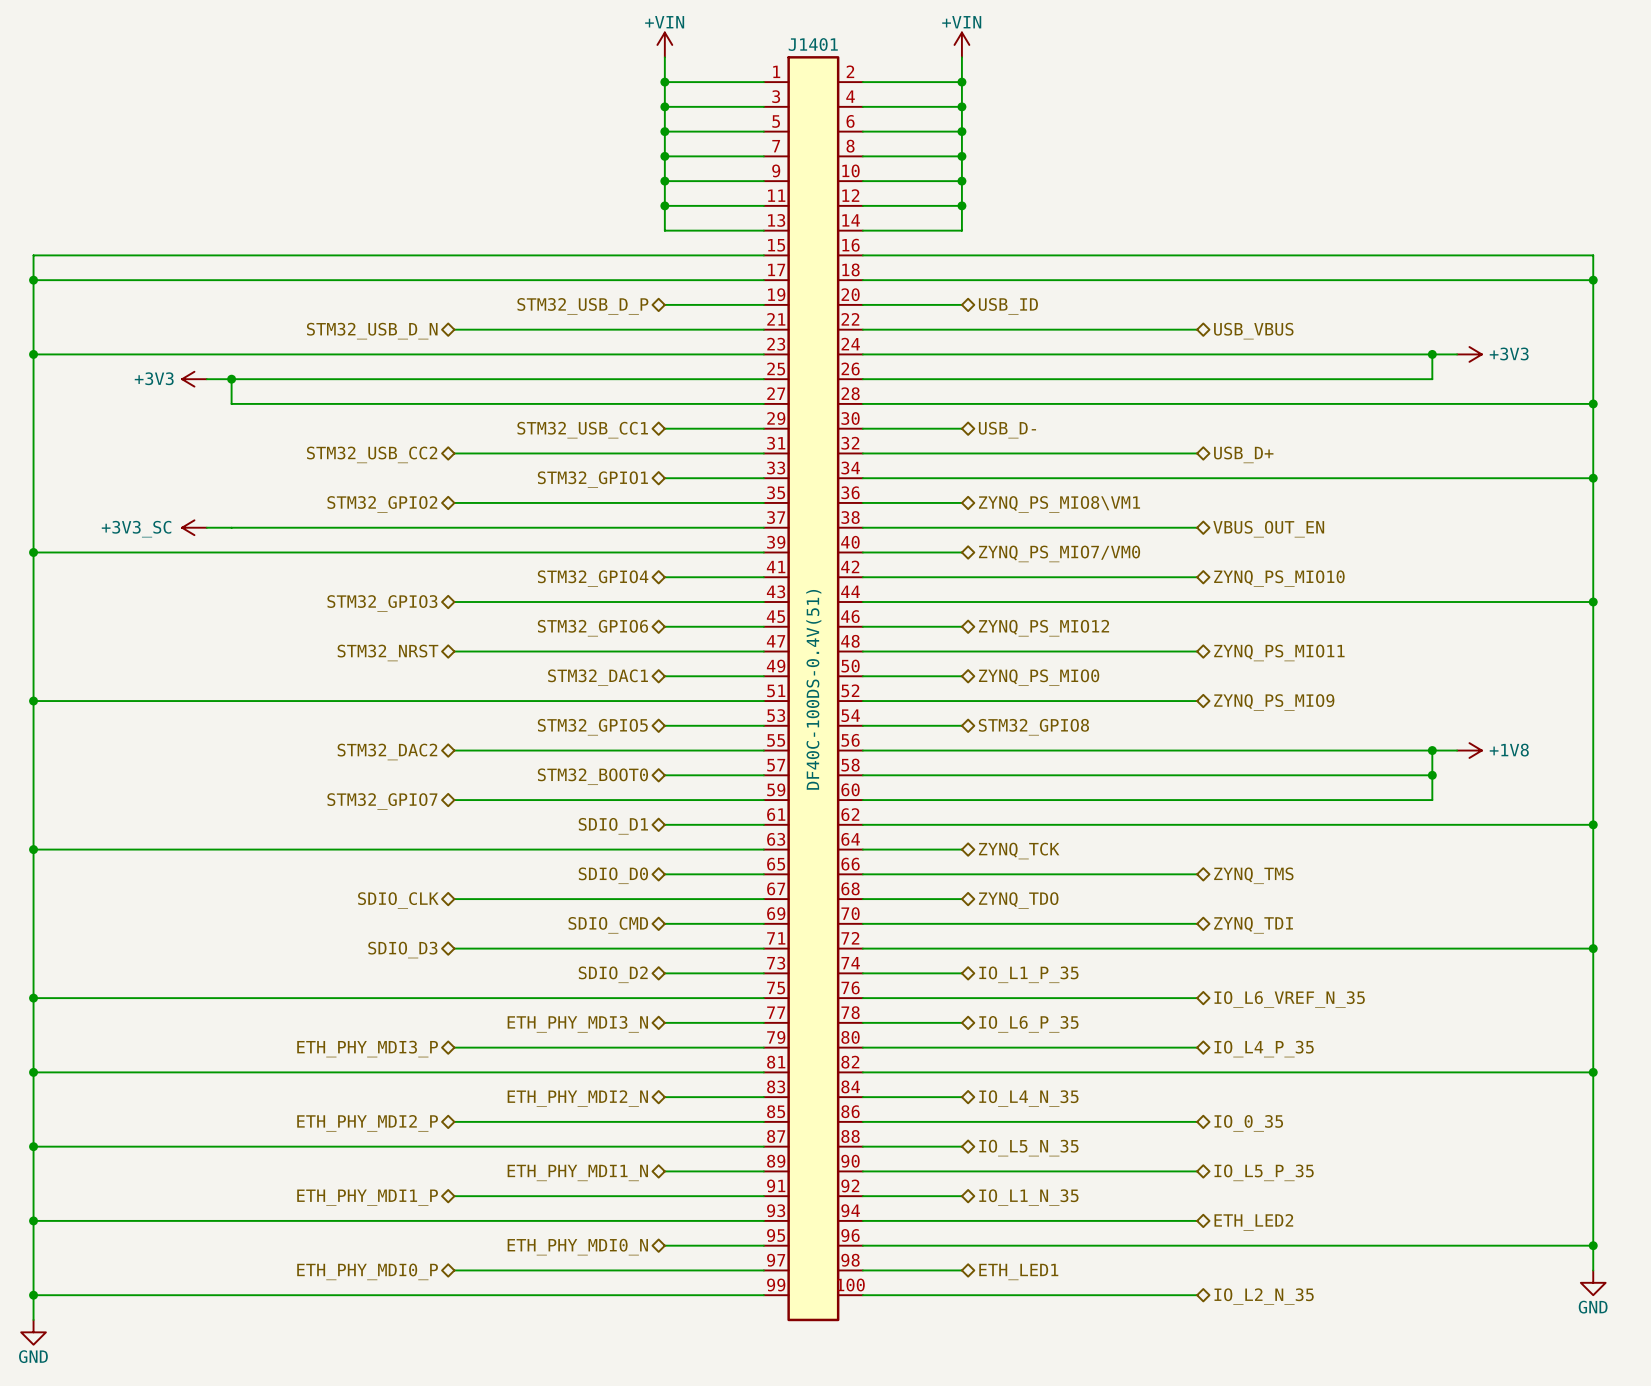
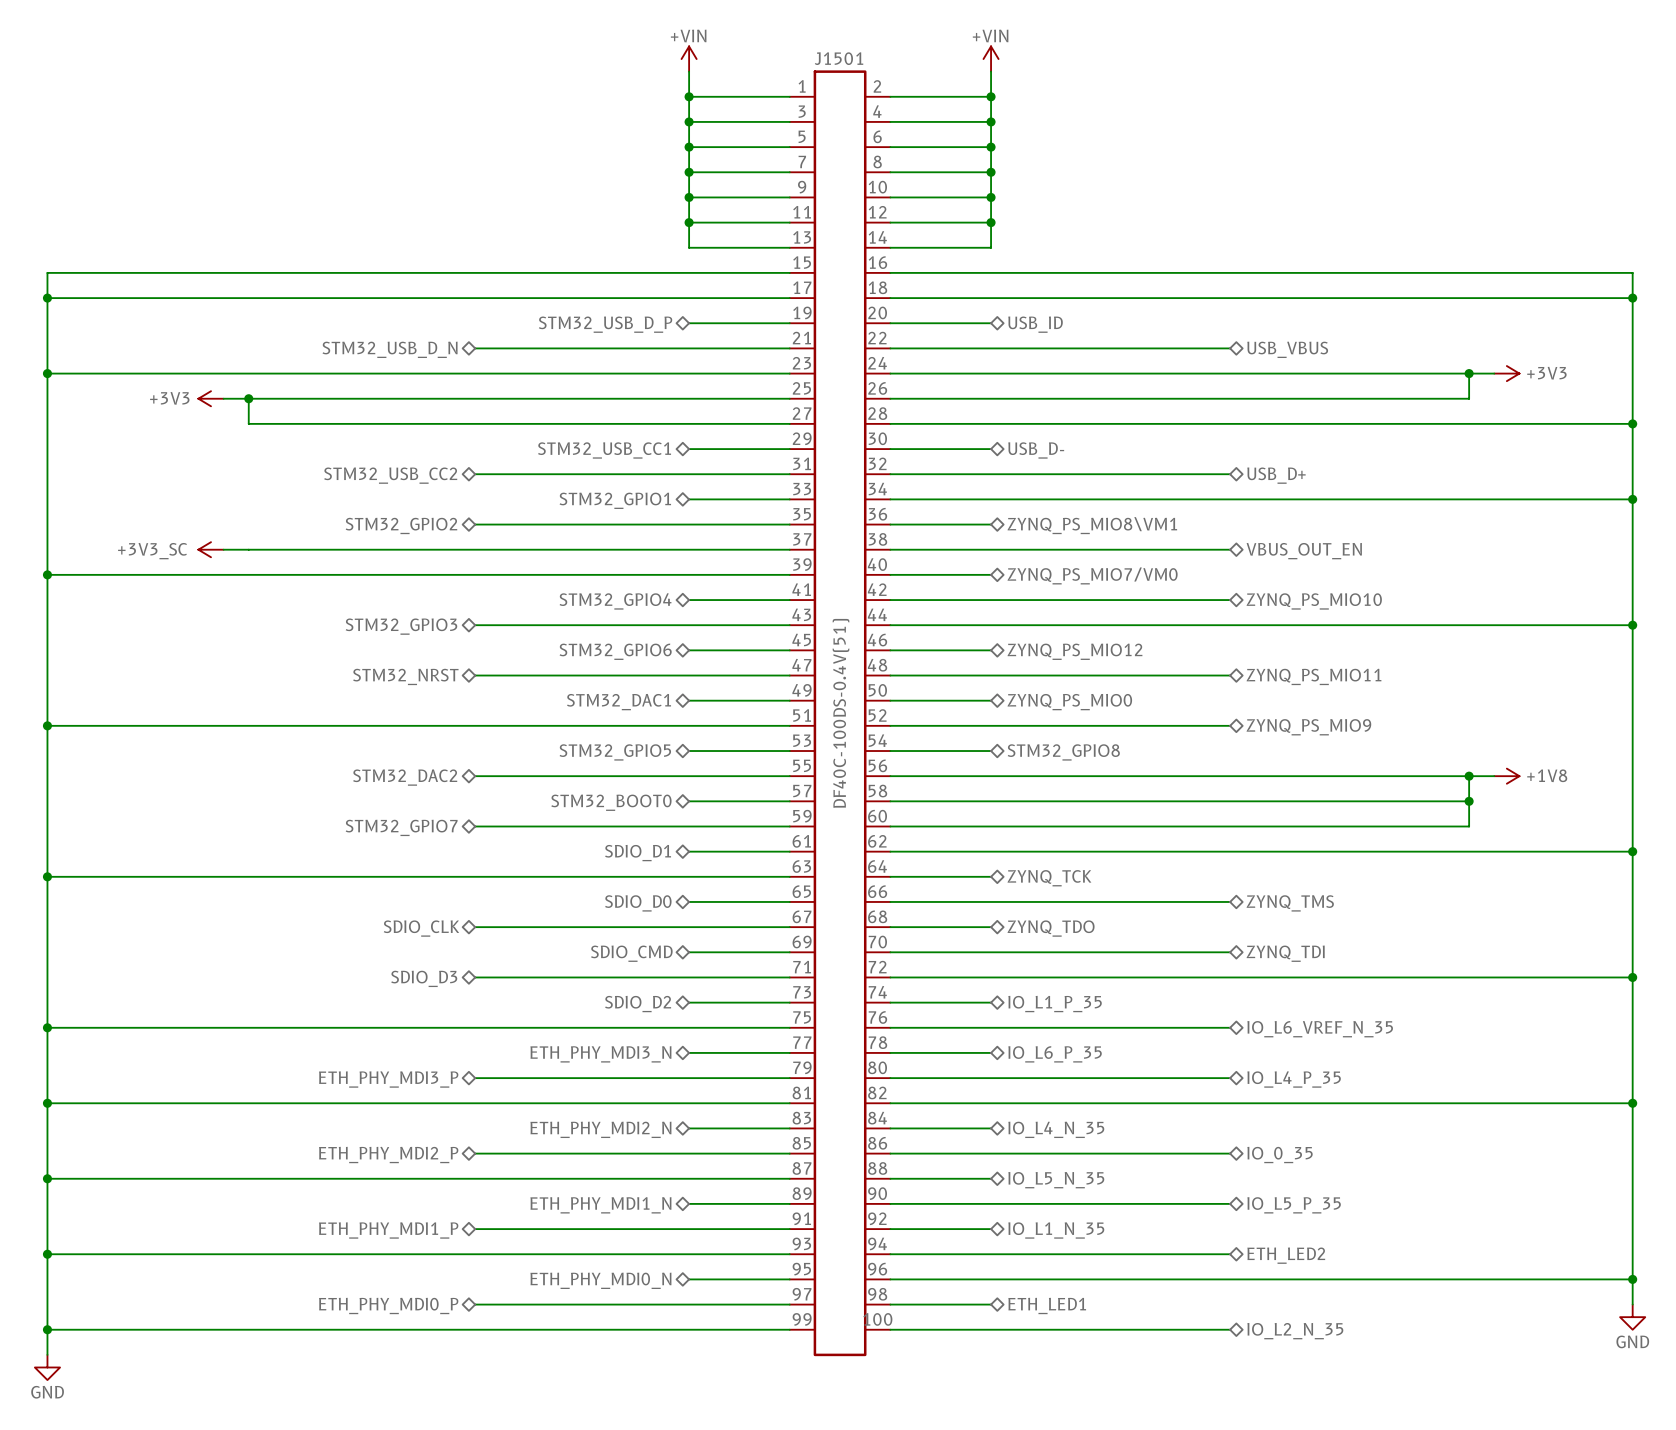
J1401 name: J1401 (813, 44) -> J1501 (839, 58)

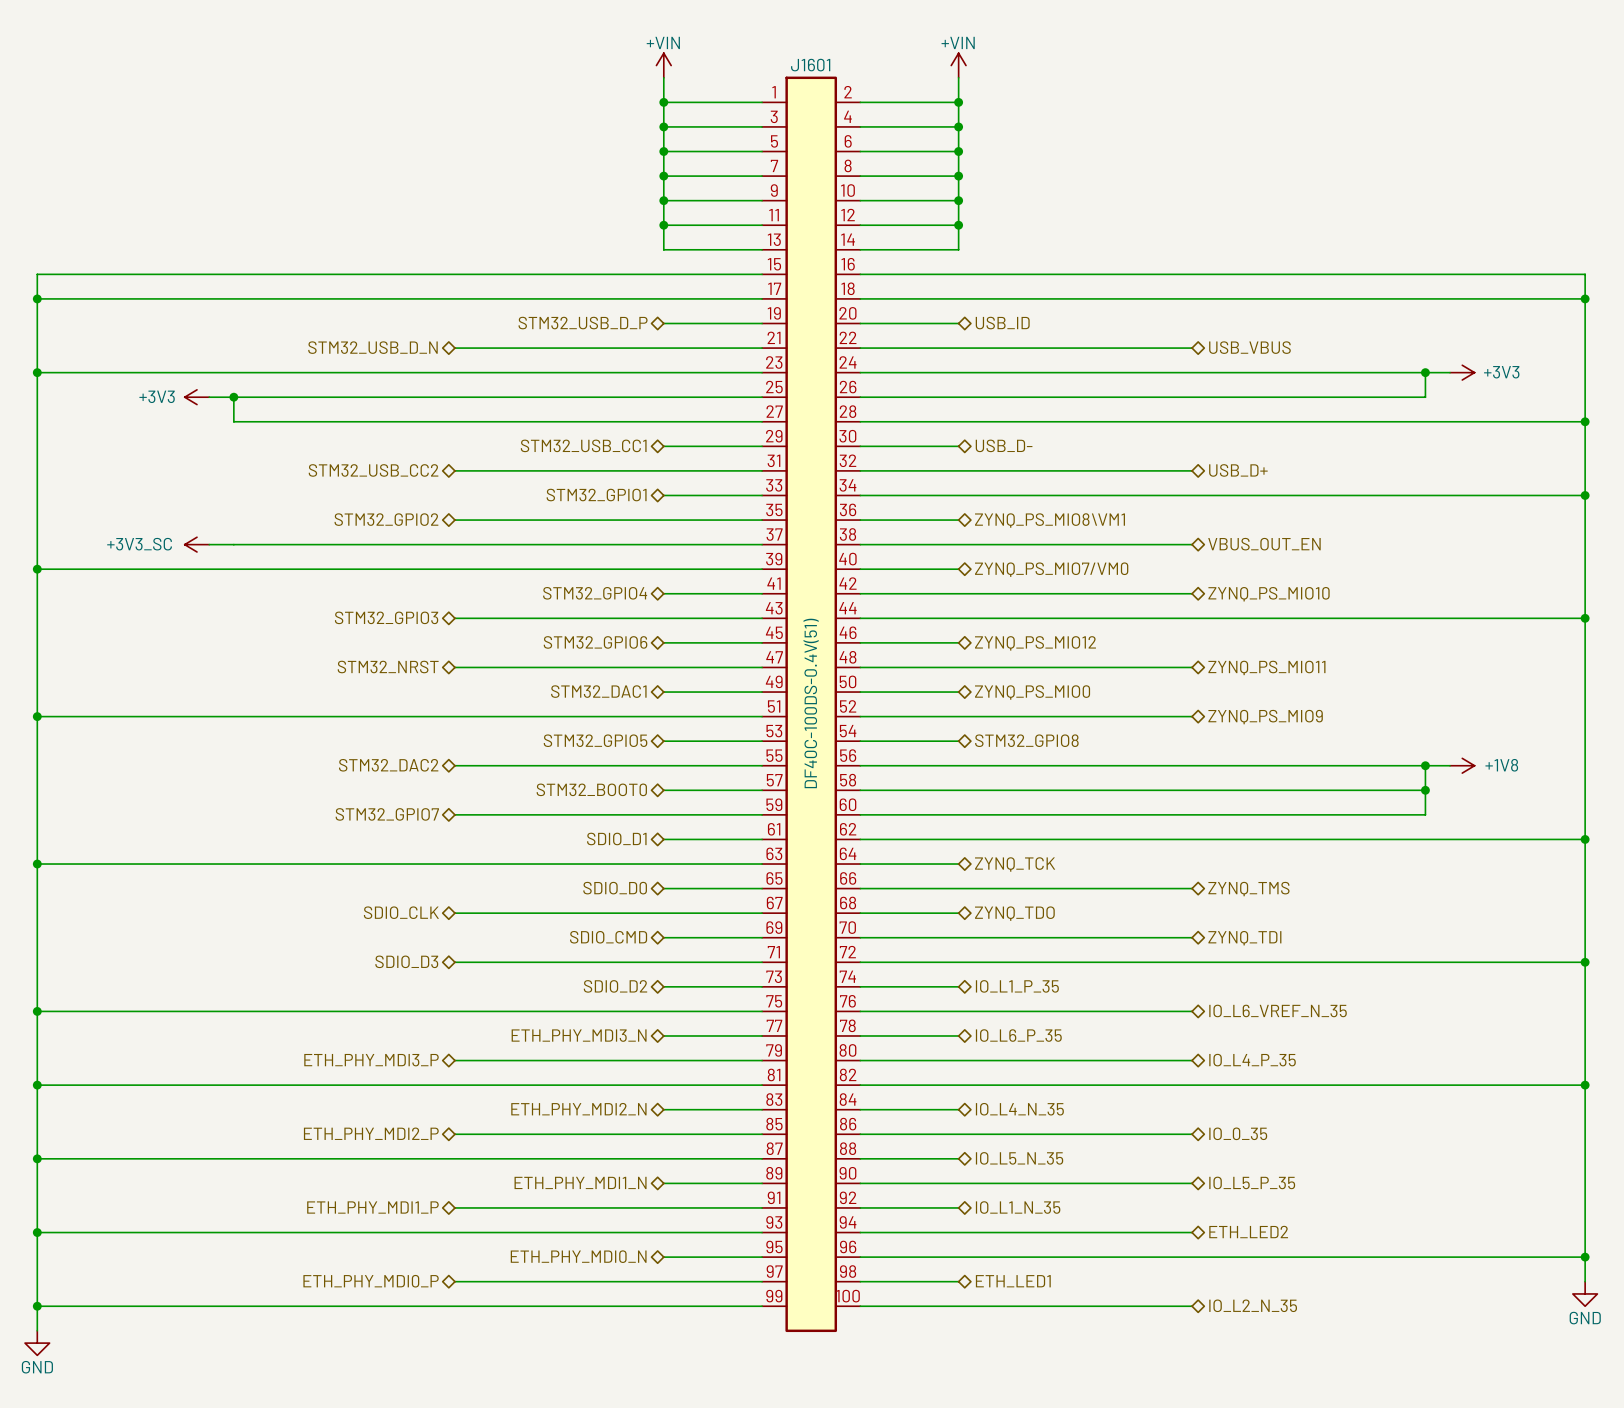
J1501 name: J1501 (839, 58) -> J1601 (810, 65)

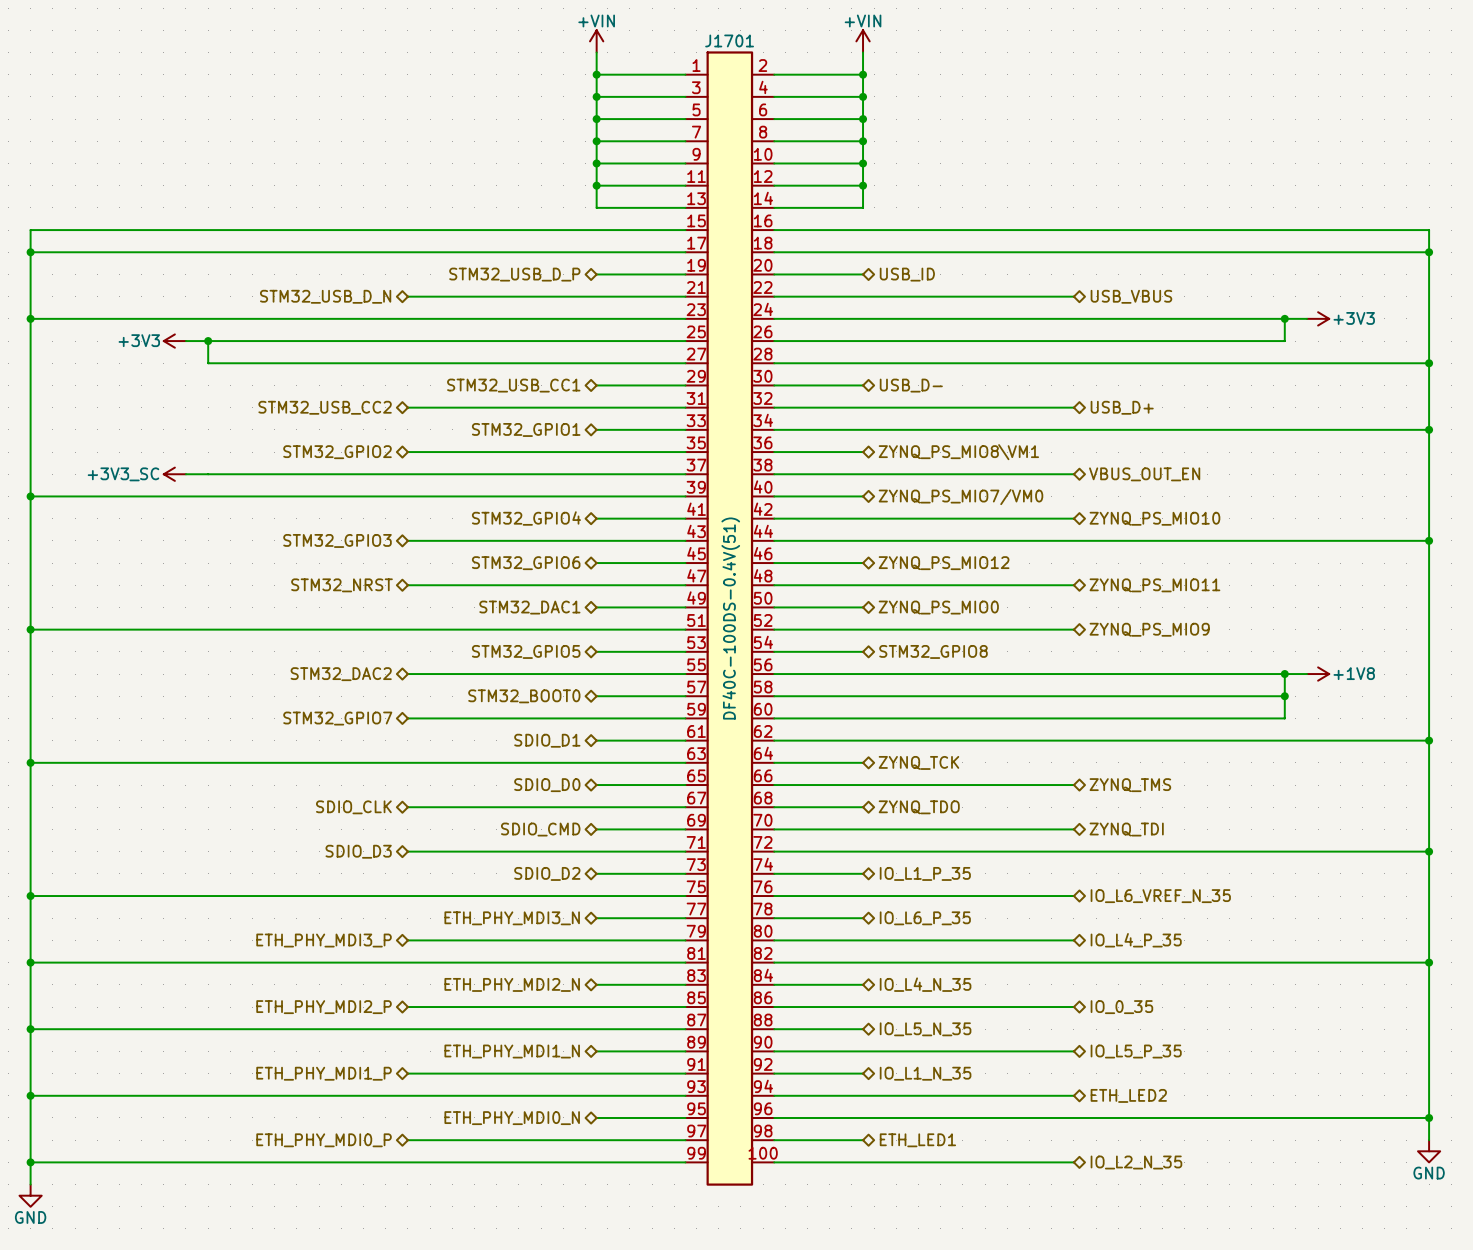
J1601 name: J1601 (810, 65) -> J1701 (729, 40)

